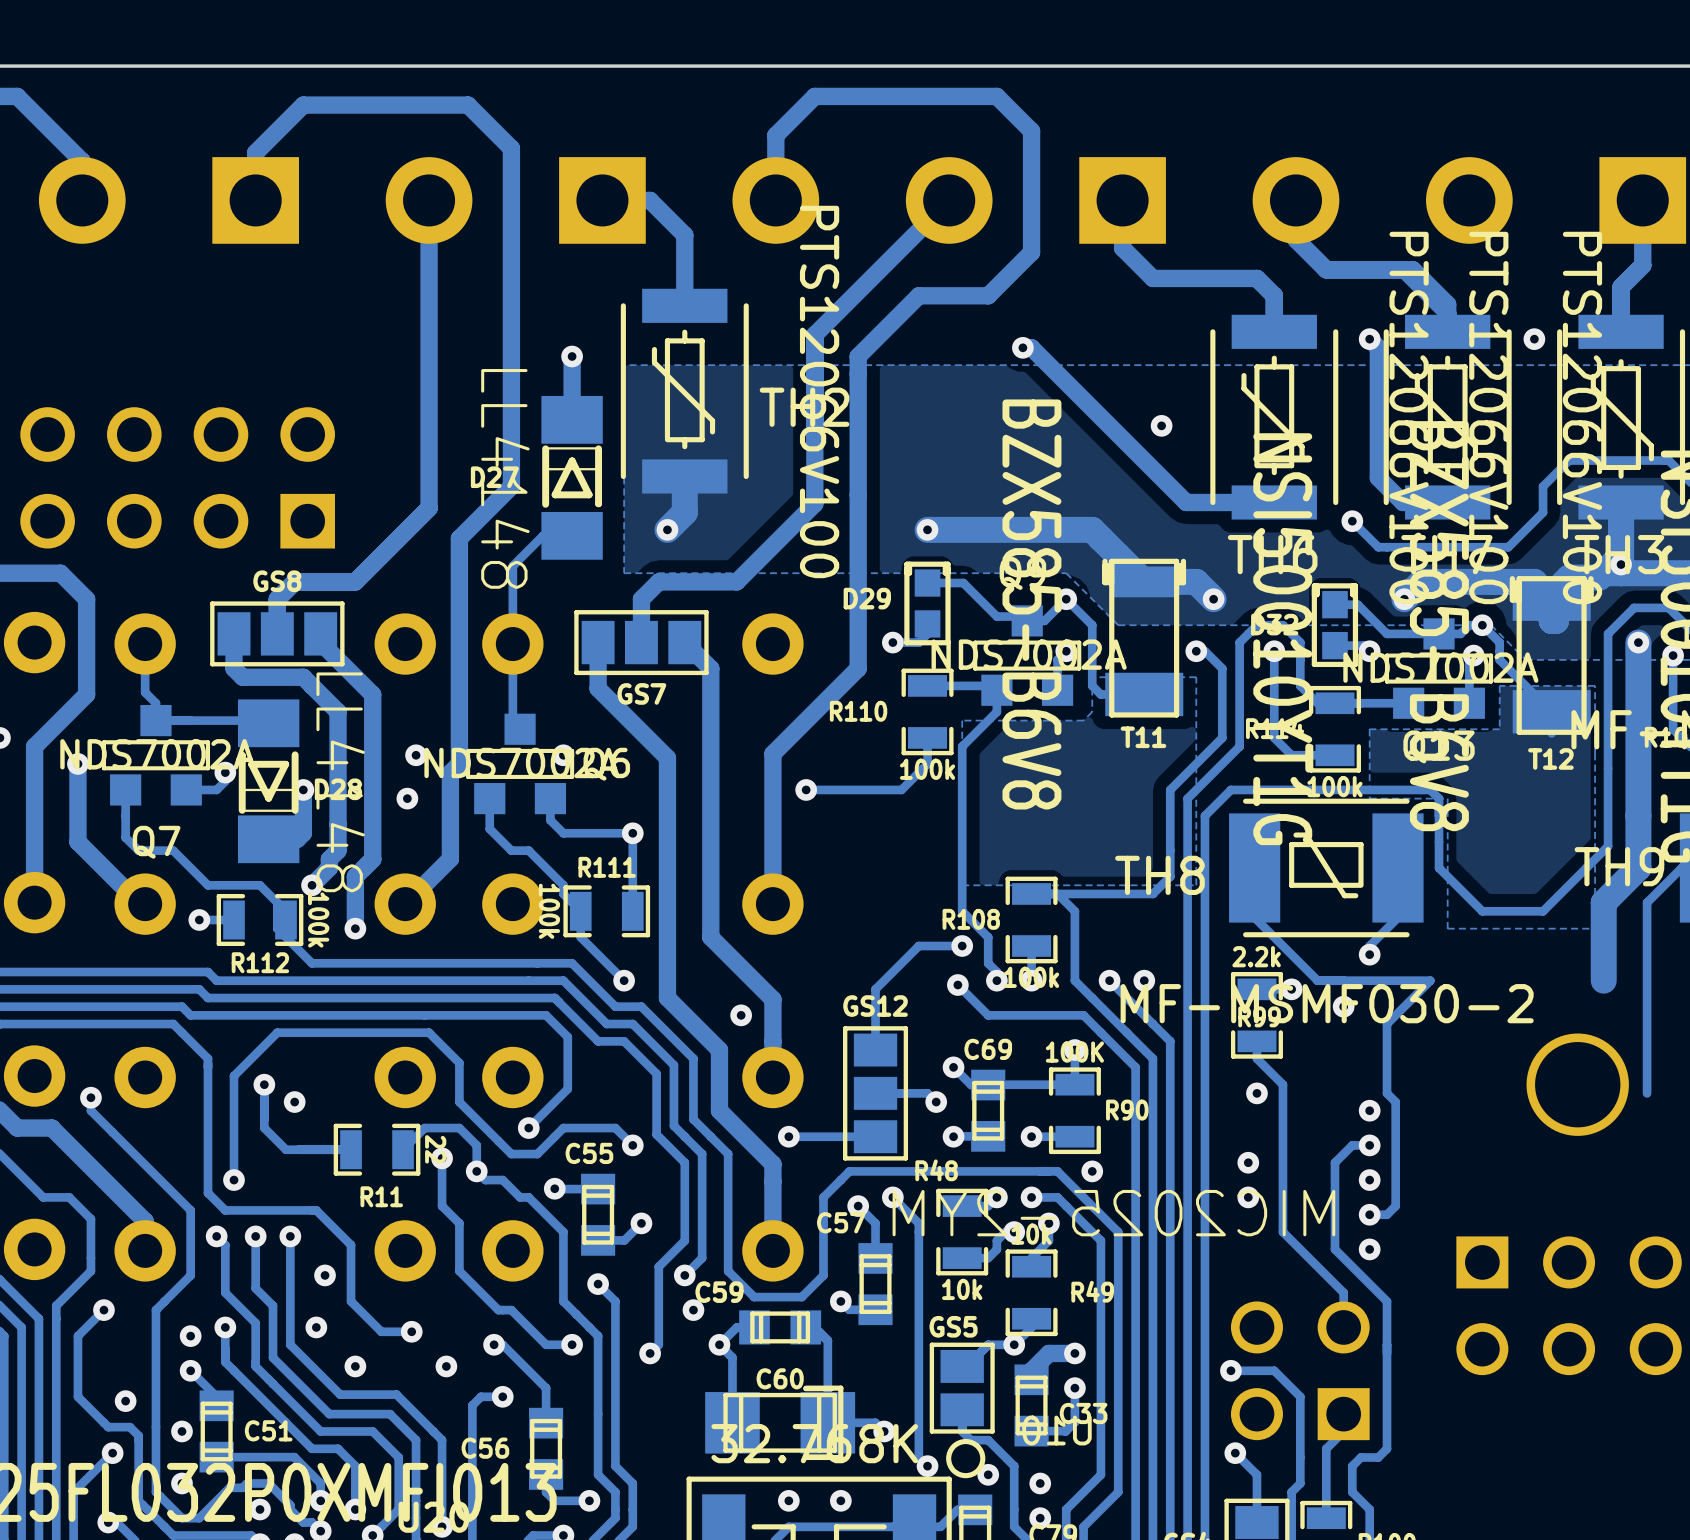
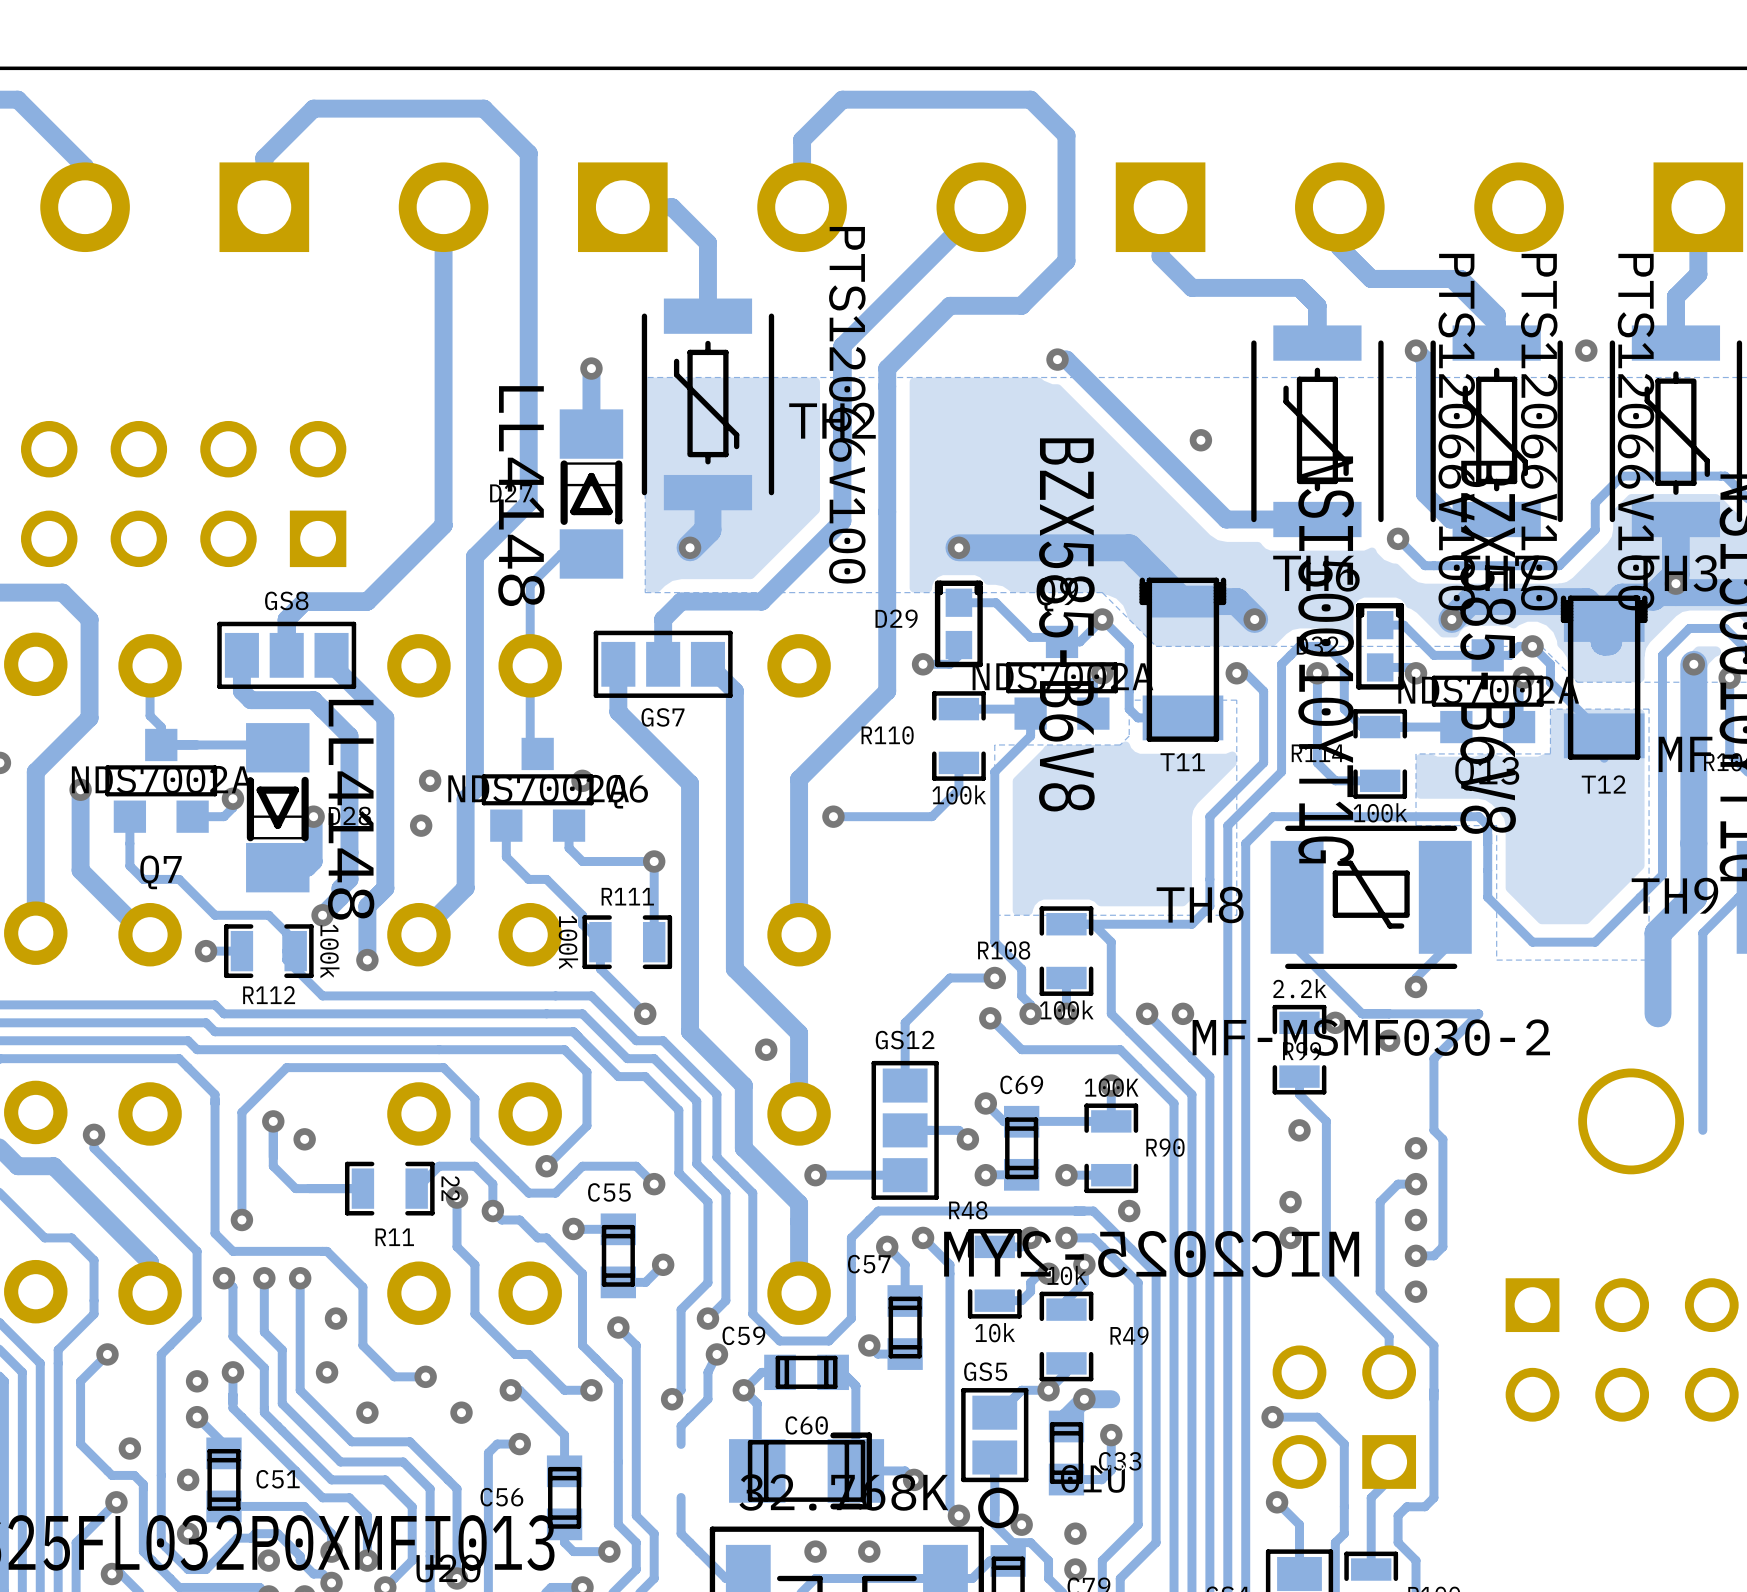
track: none -> (716, 1354) (707, 1372) (707, 1399) (681, 1426) (681, 1444)
via position: (1074, 1353) -> (1084, 1399)
track: (962, 1431) (970, 1440) (988, 1440) (1014, 1466) (1014, 1509) -> (994, 1479) (994, 1524) (1012, 1542) (1030, 1542) (1048, 1560)
track: none -> (681, 1497) (681, 1533) (725, 1578) (757, 1578)

